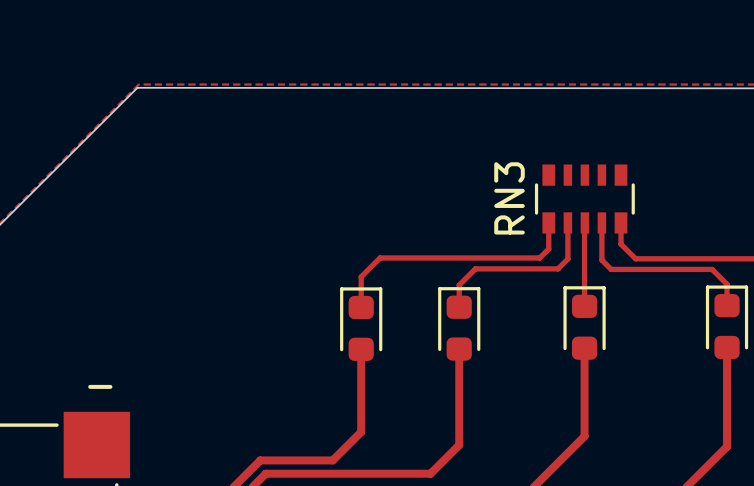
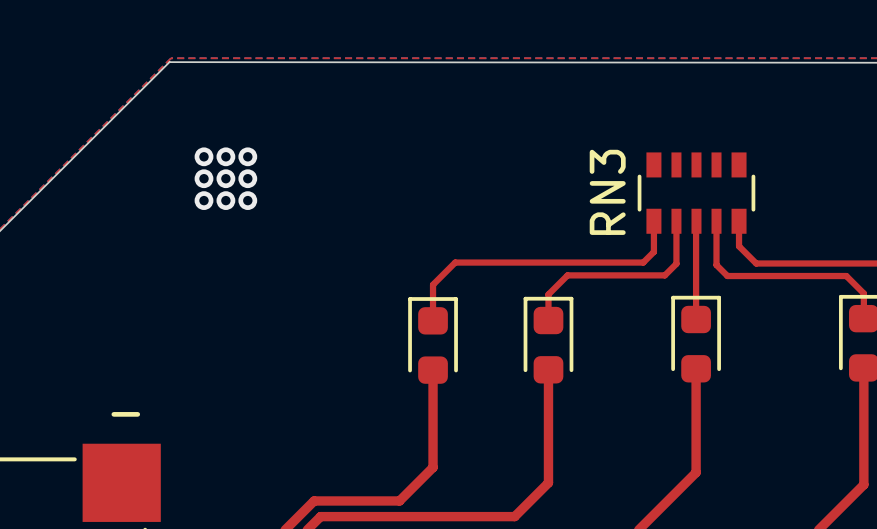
via: none -> (204, 156)
via: none -> (225, 156)
via: none -> (247, 156)
via: none -> (204, 178)
via: none -> (225, 178)
via: none -> (247, 178)
via: none -> (204, 200)
via: none -> (225, 200)
via: none -> (247, 200)

